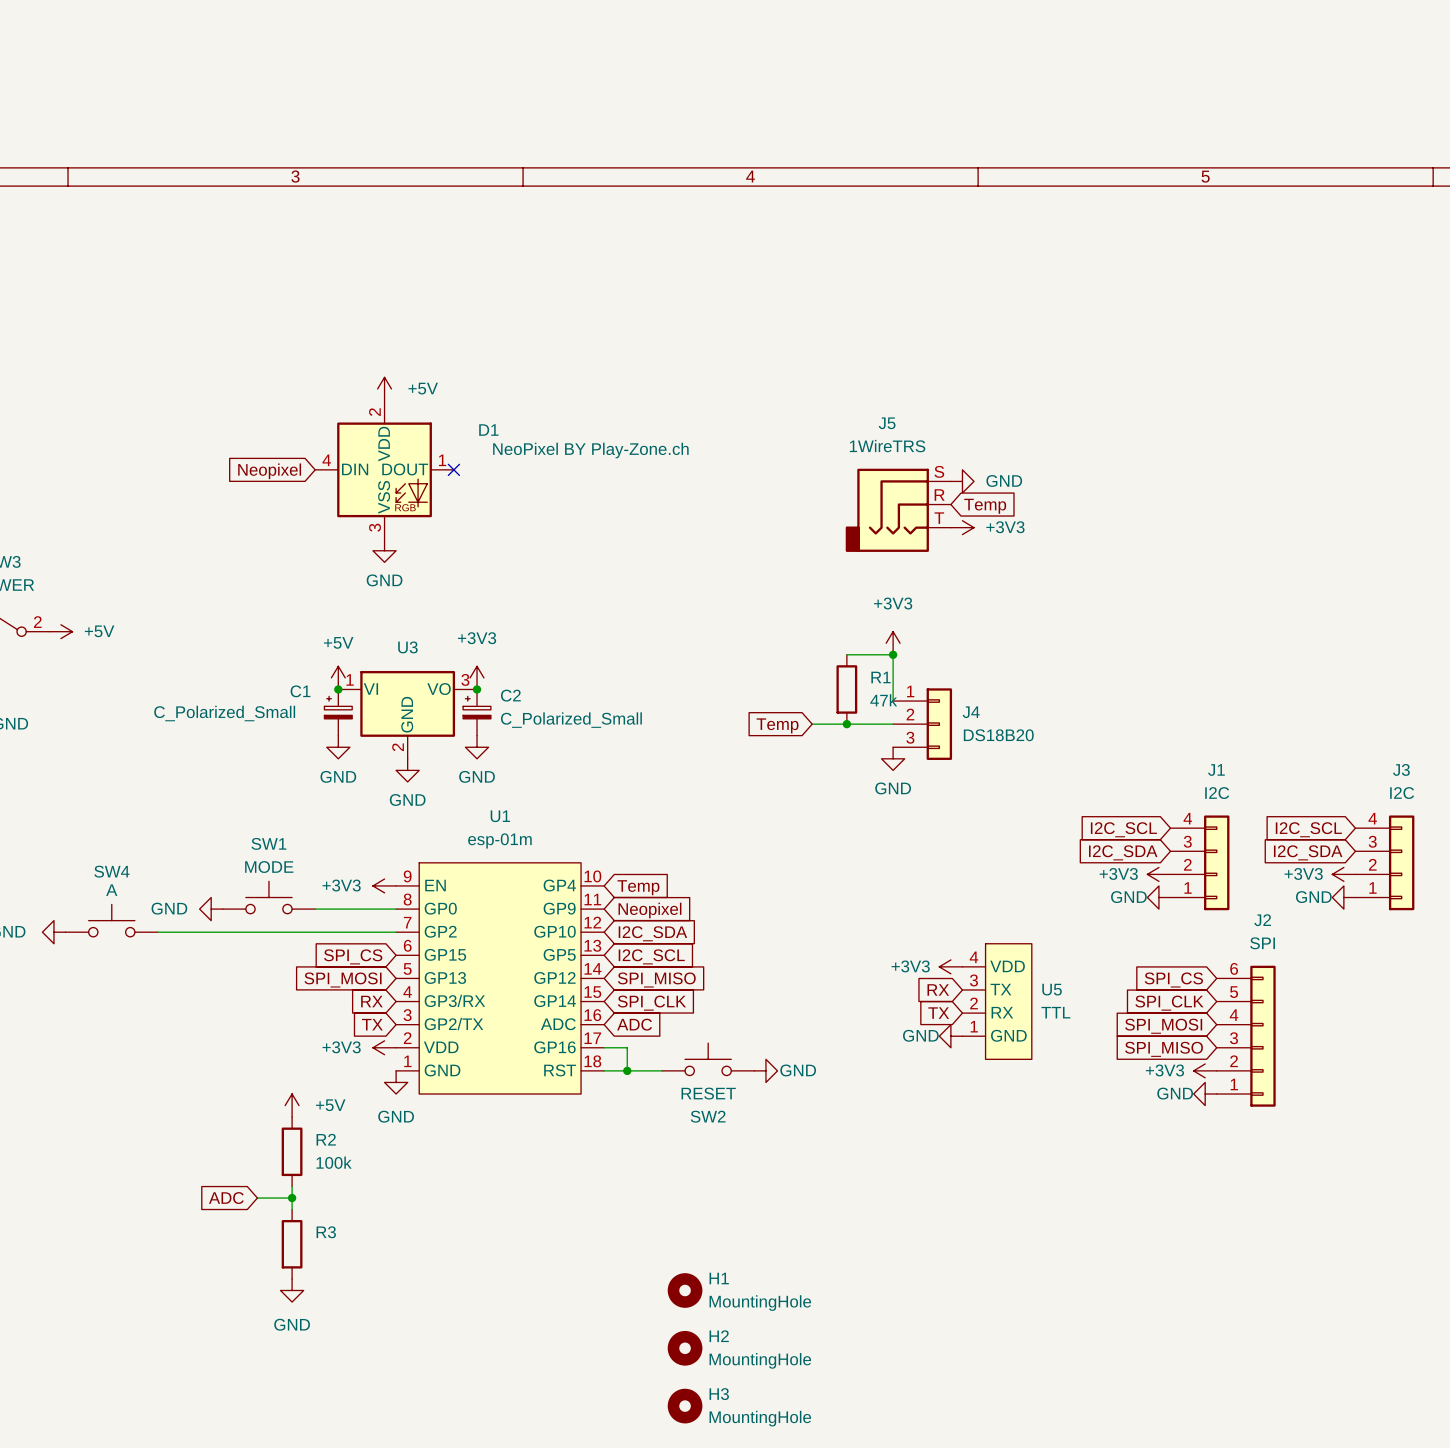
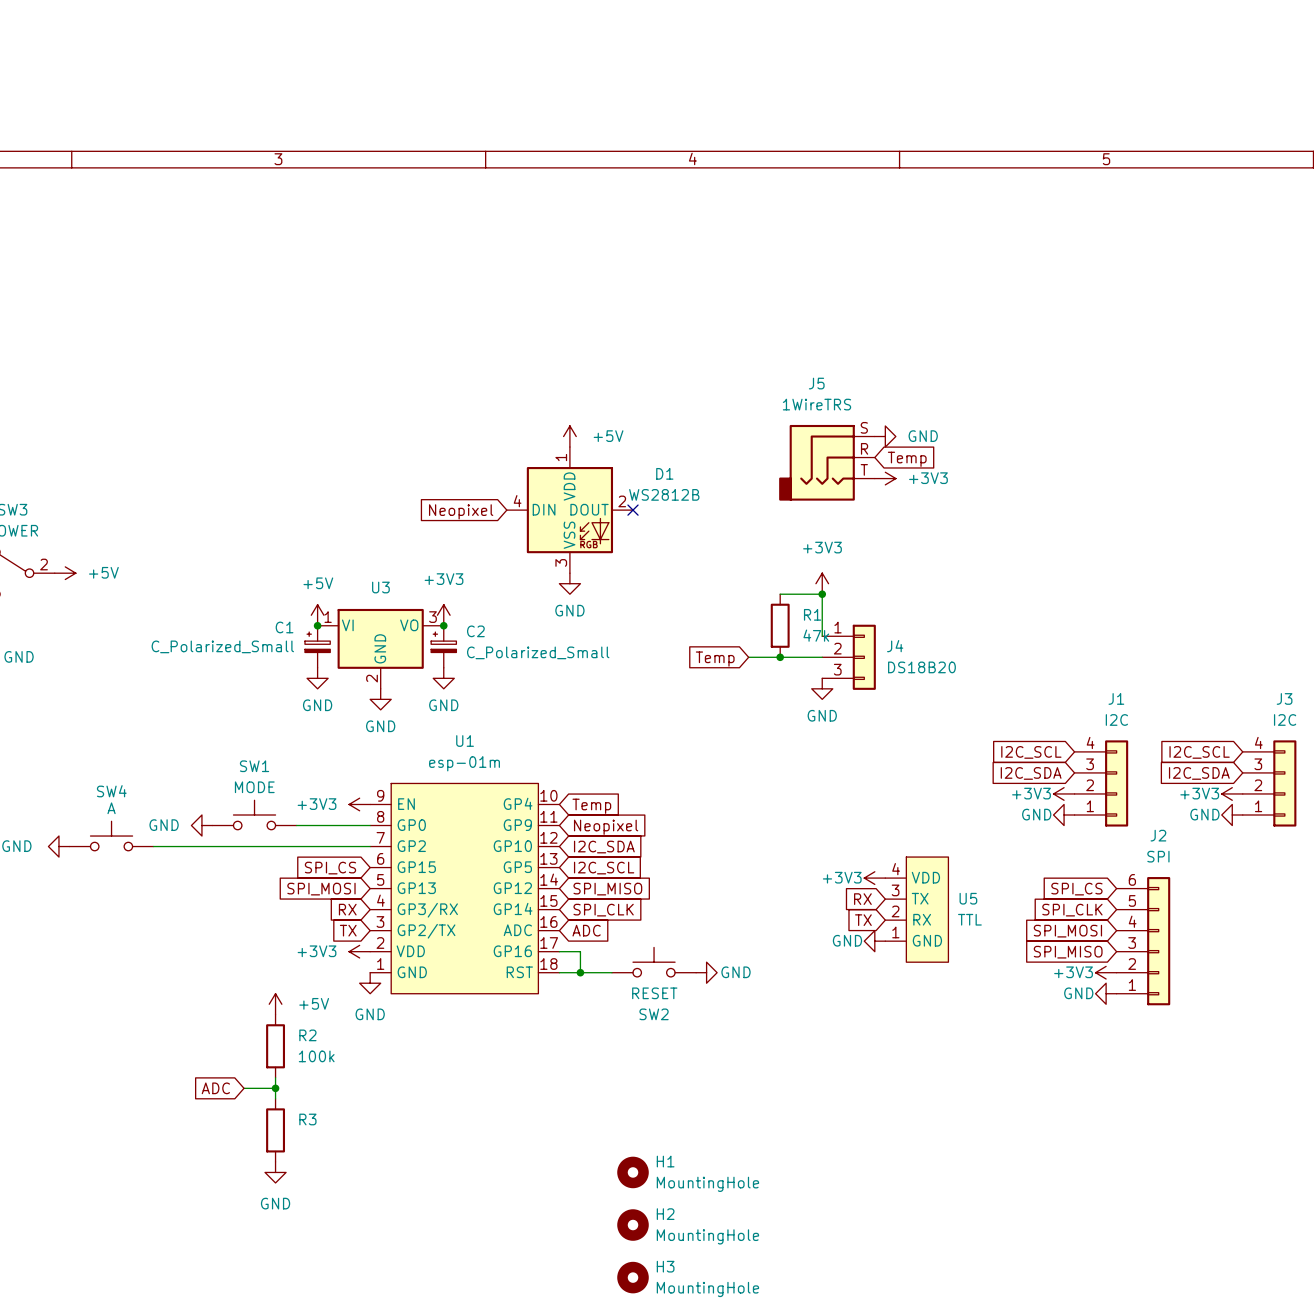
power symbol: +5V (384, 388) -> none
D1 pin number: 2 (374, 412) -> 1 (561, 457)
D1 value: NeoPixel BY Play-Zone.ch (590, 450) -> WS2812B (664, 494)
D1 pin number: 1 (442, 460) -> 2 (622, 501)
D1 position: (384, 469) -> (569, 510)
no-connect mark: (453, 469) -> none
global label: Neopixel (269, 471) -> none
power symbol: none -> +5V (569, 436)
power symbol: GND (384, 550) -> none
no-connect mark: none -> (633, 510)
global label: none -> Neopixel (461, 511)
power symbol: none -> GND (569, 583)

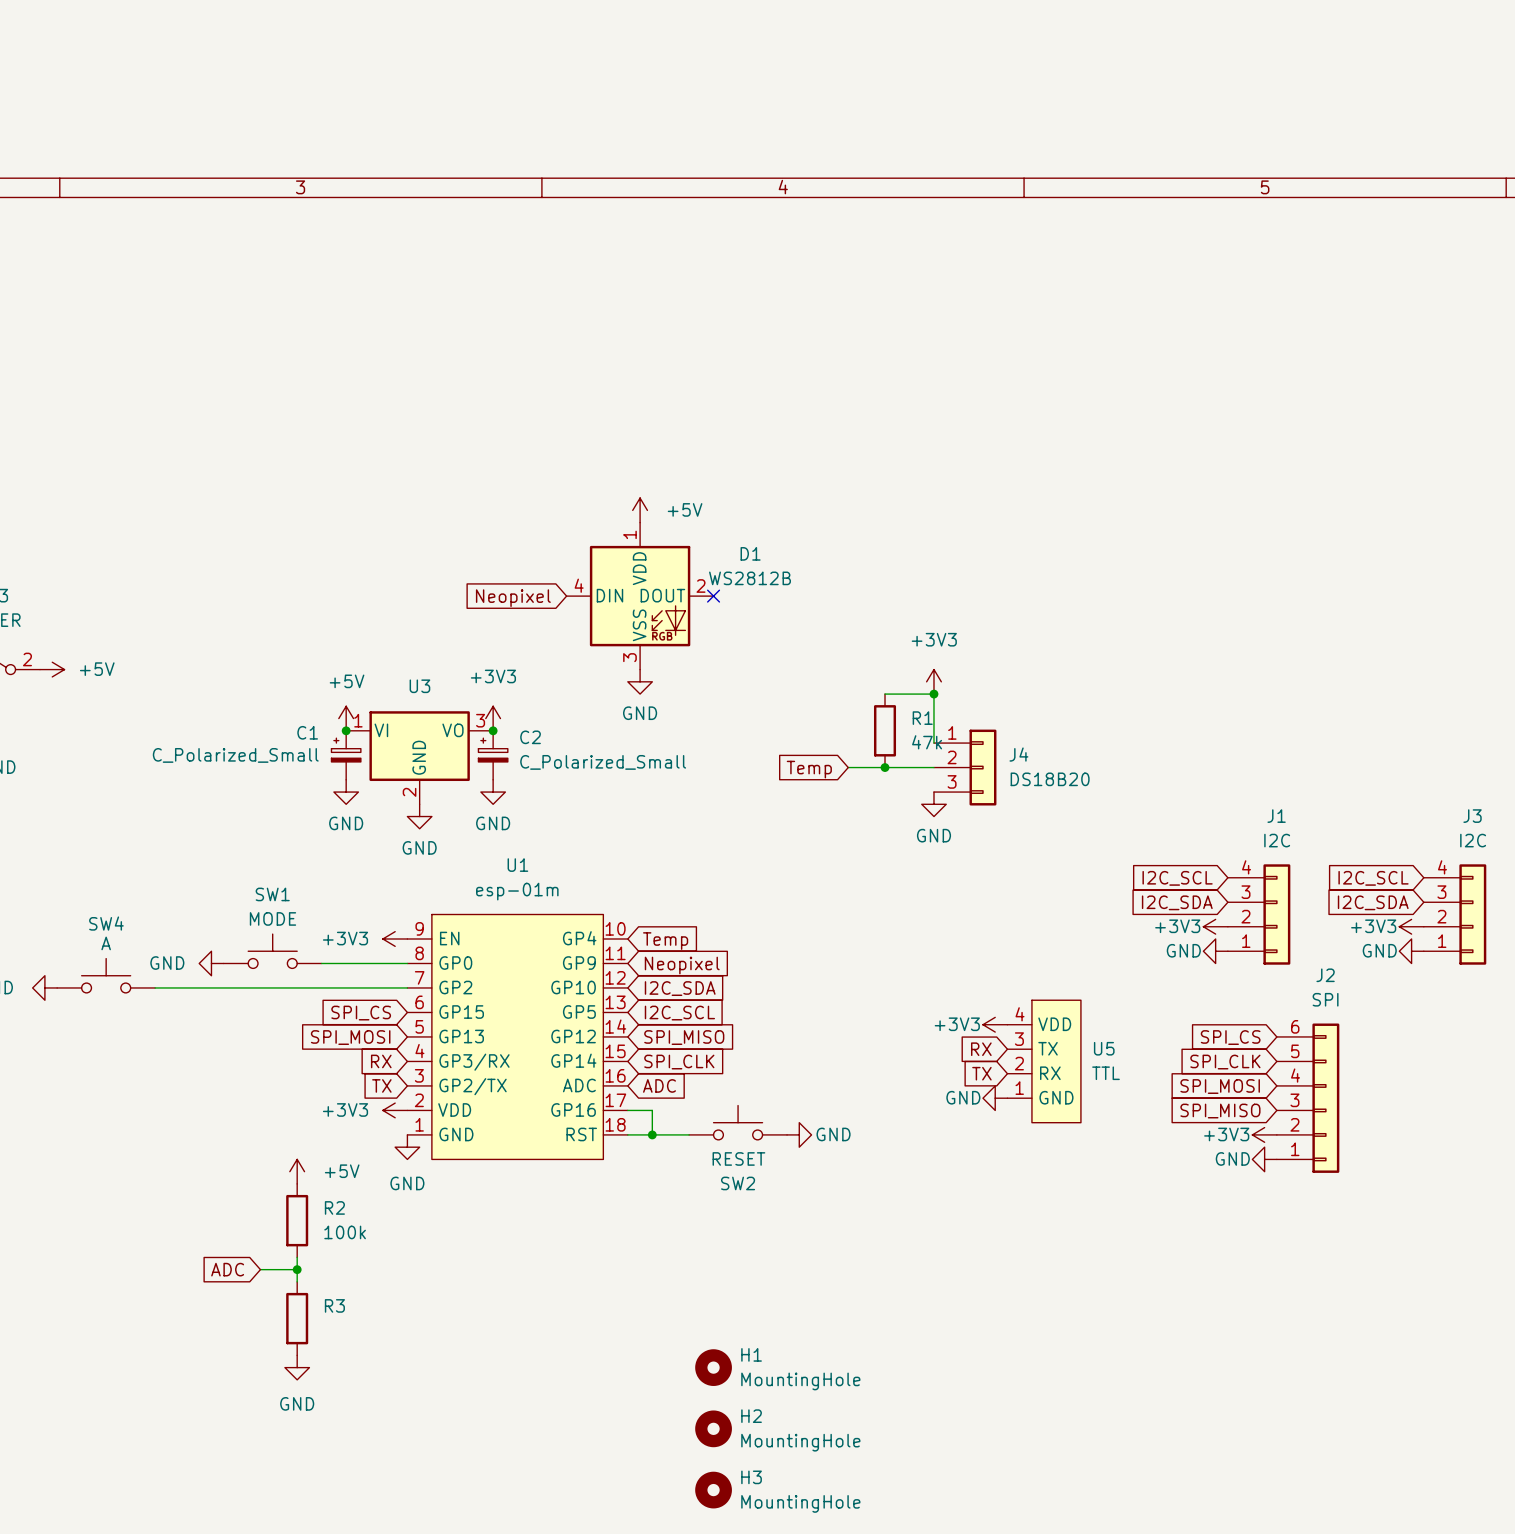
power symbol: GND (885, 436) -> none
global label: Temp (907, 459) -> none
J5: 1WireTRS (826, 462) -> none
power symbol: +3V3 (885, 478) -> none

